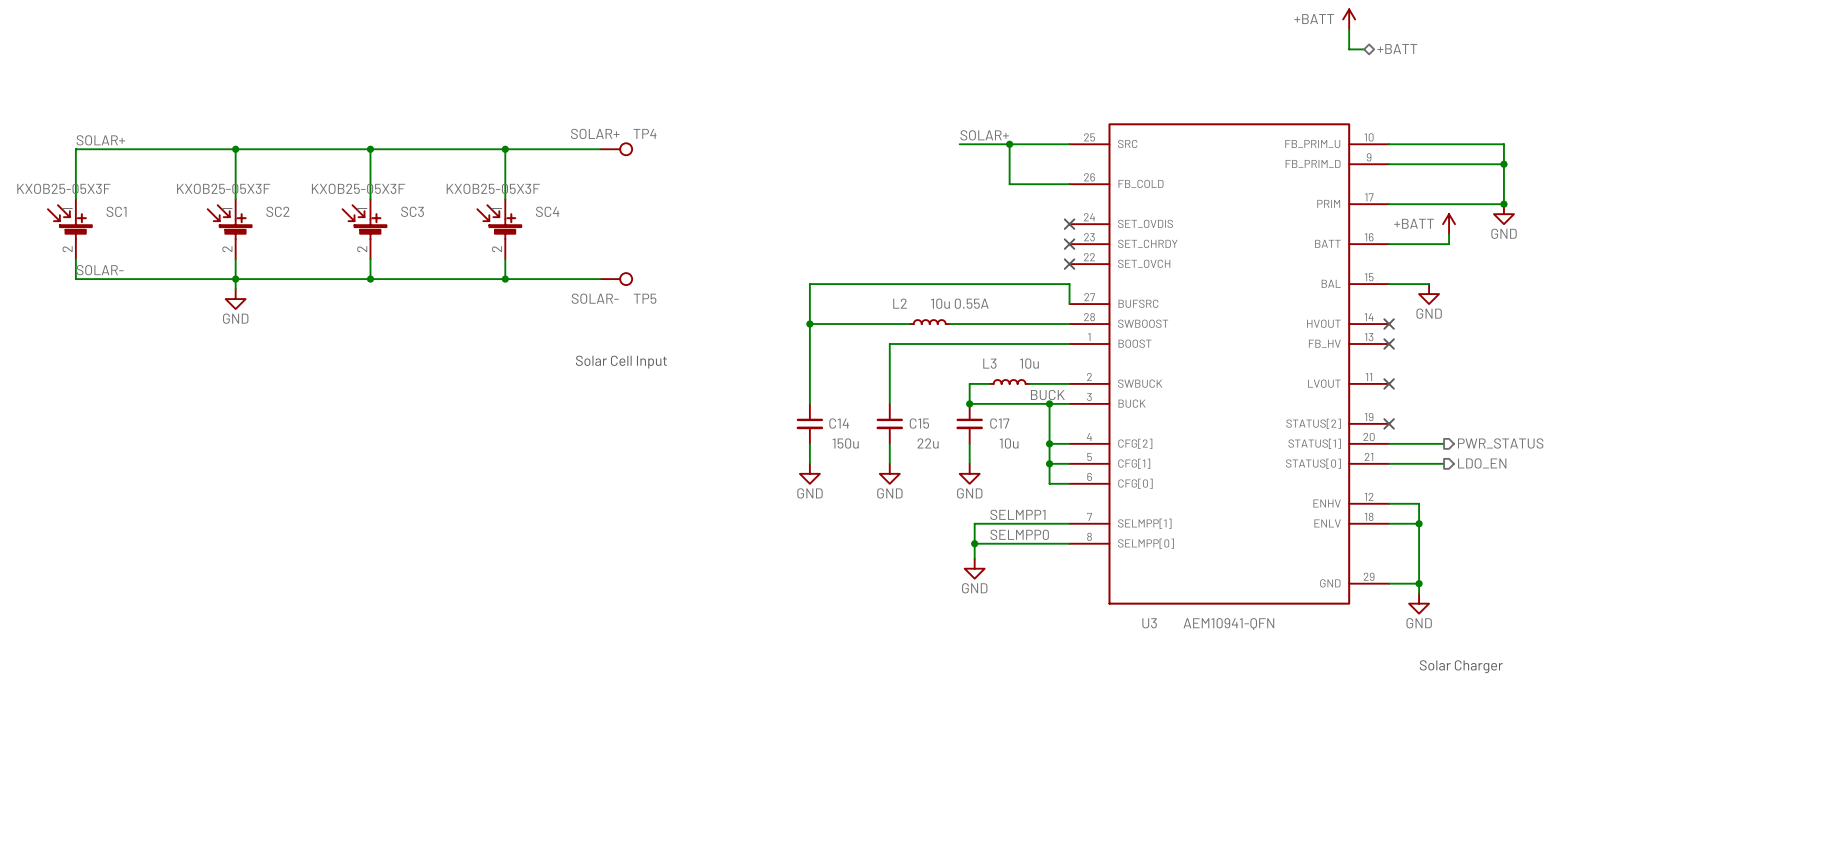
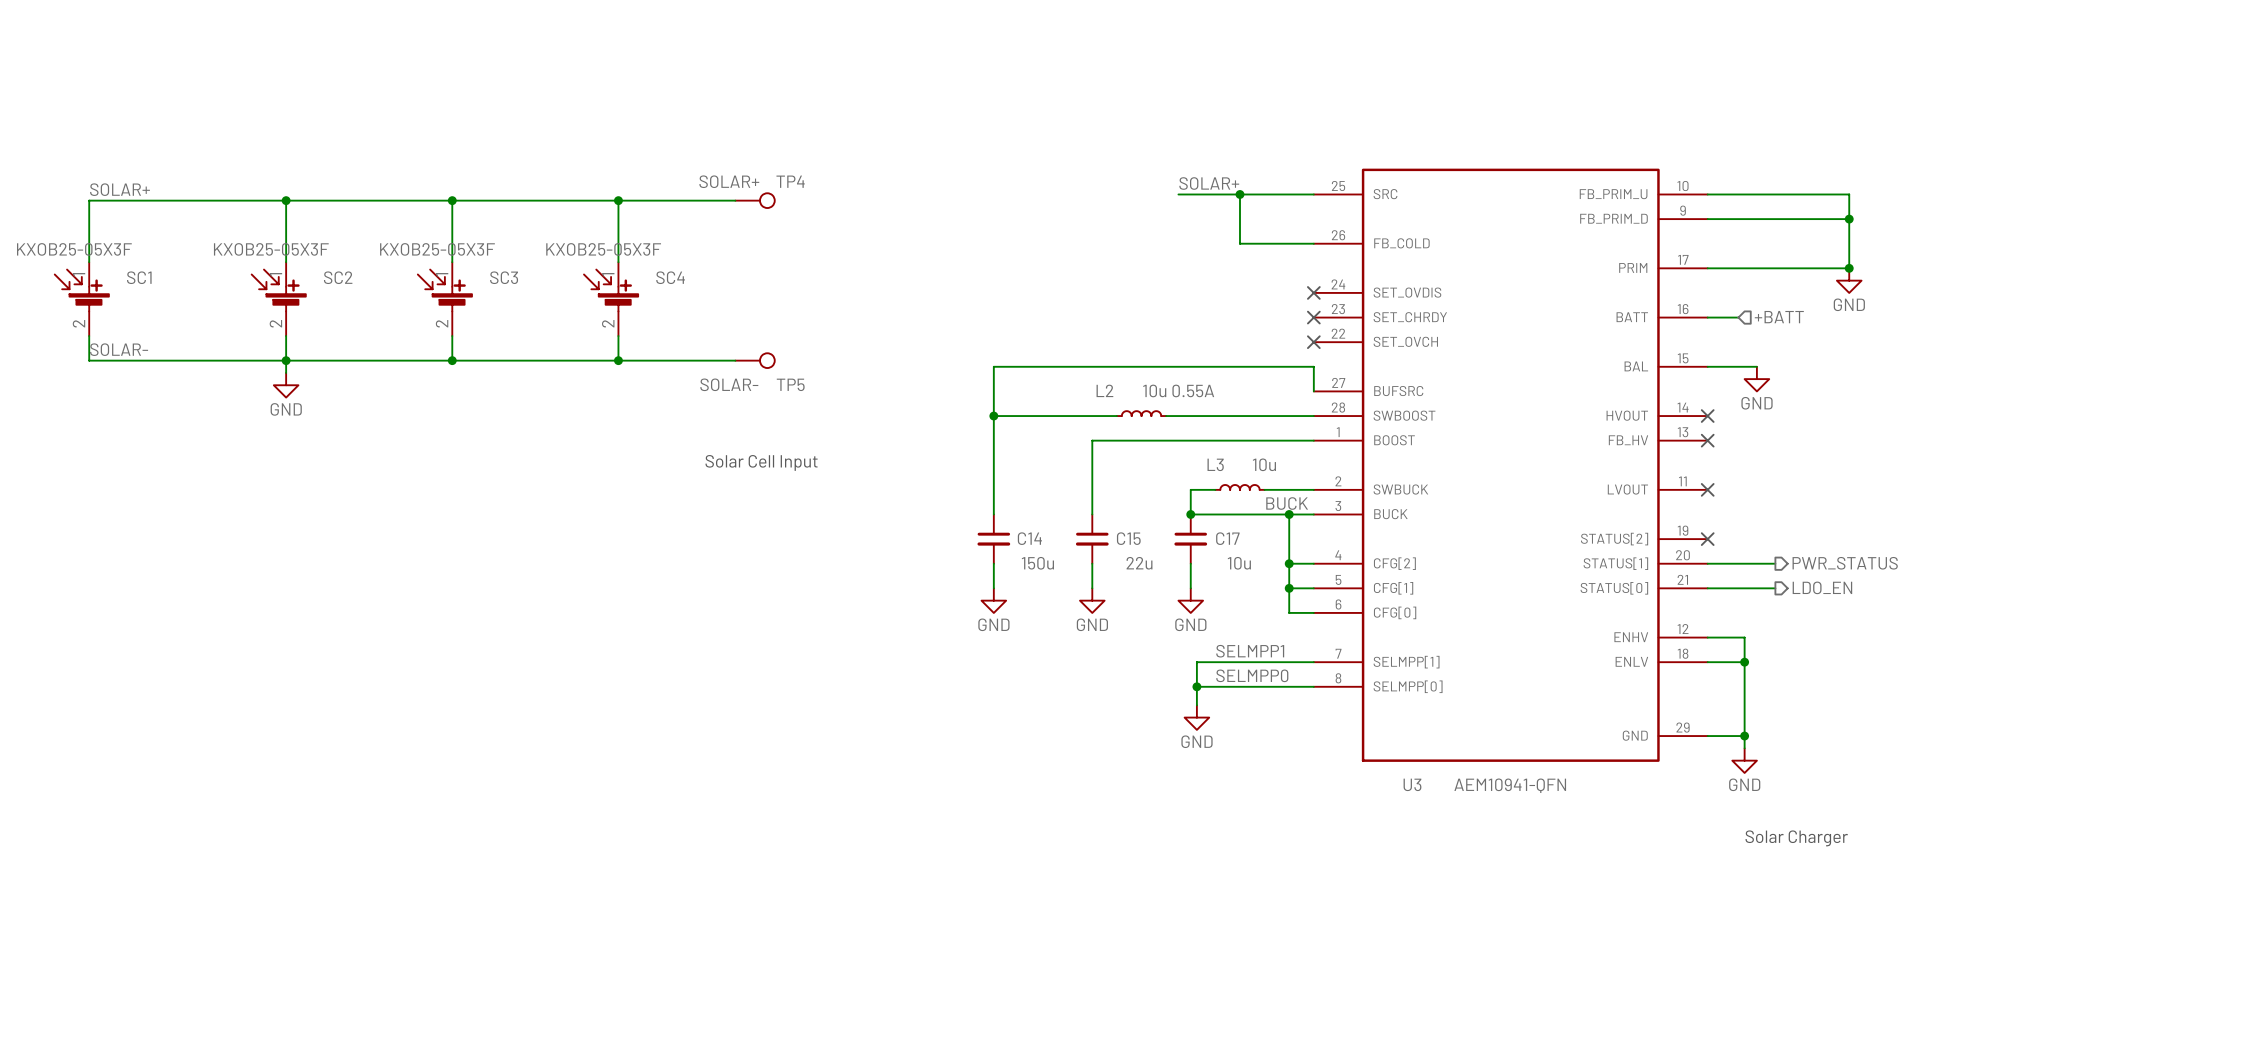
power symbol: +BATT (1349, 19) -> none
wire: (1349, 29) (1349, 49) (1364, 49) -> none
hierarchical label: +BATT (1397, 49) -> none
power symbol: +BATT (1449, 224) -> none
wire: (1449, 234) (1449, 244) (1414, 244) -> none
hierarchical label: none -> +BATT (1779, 317)

